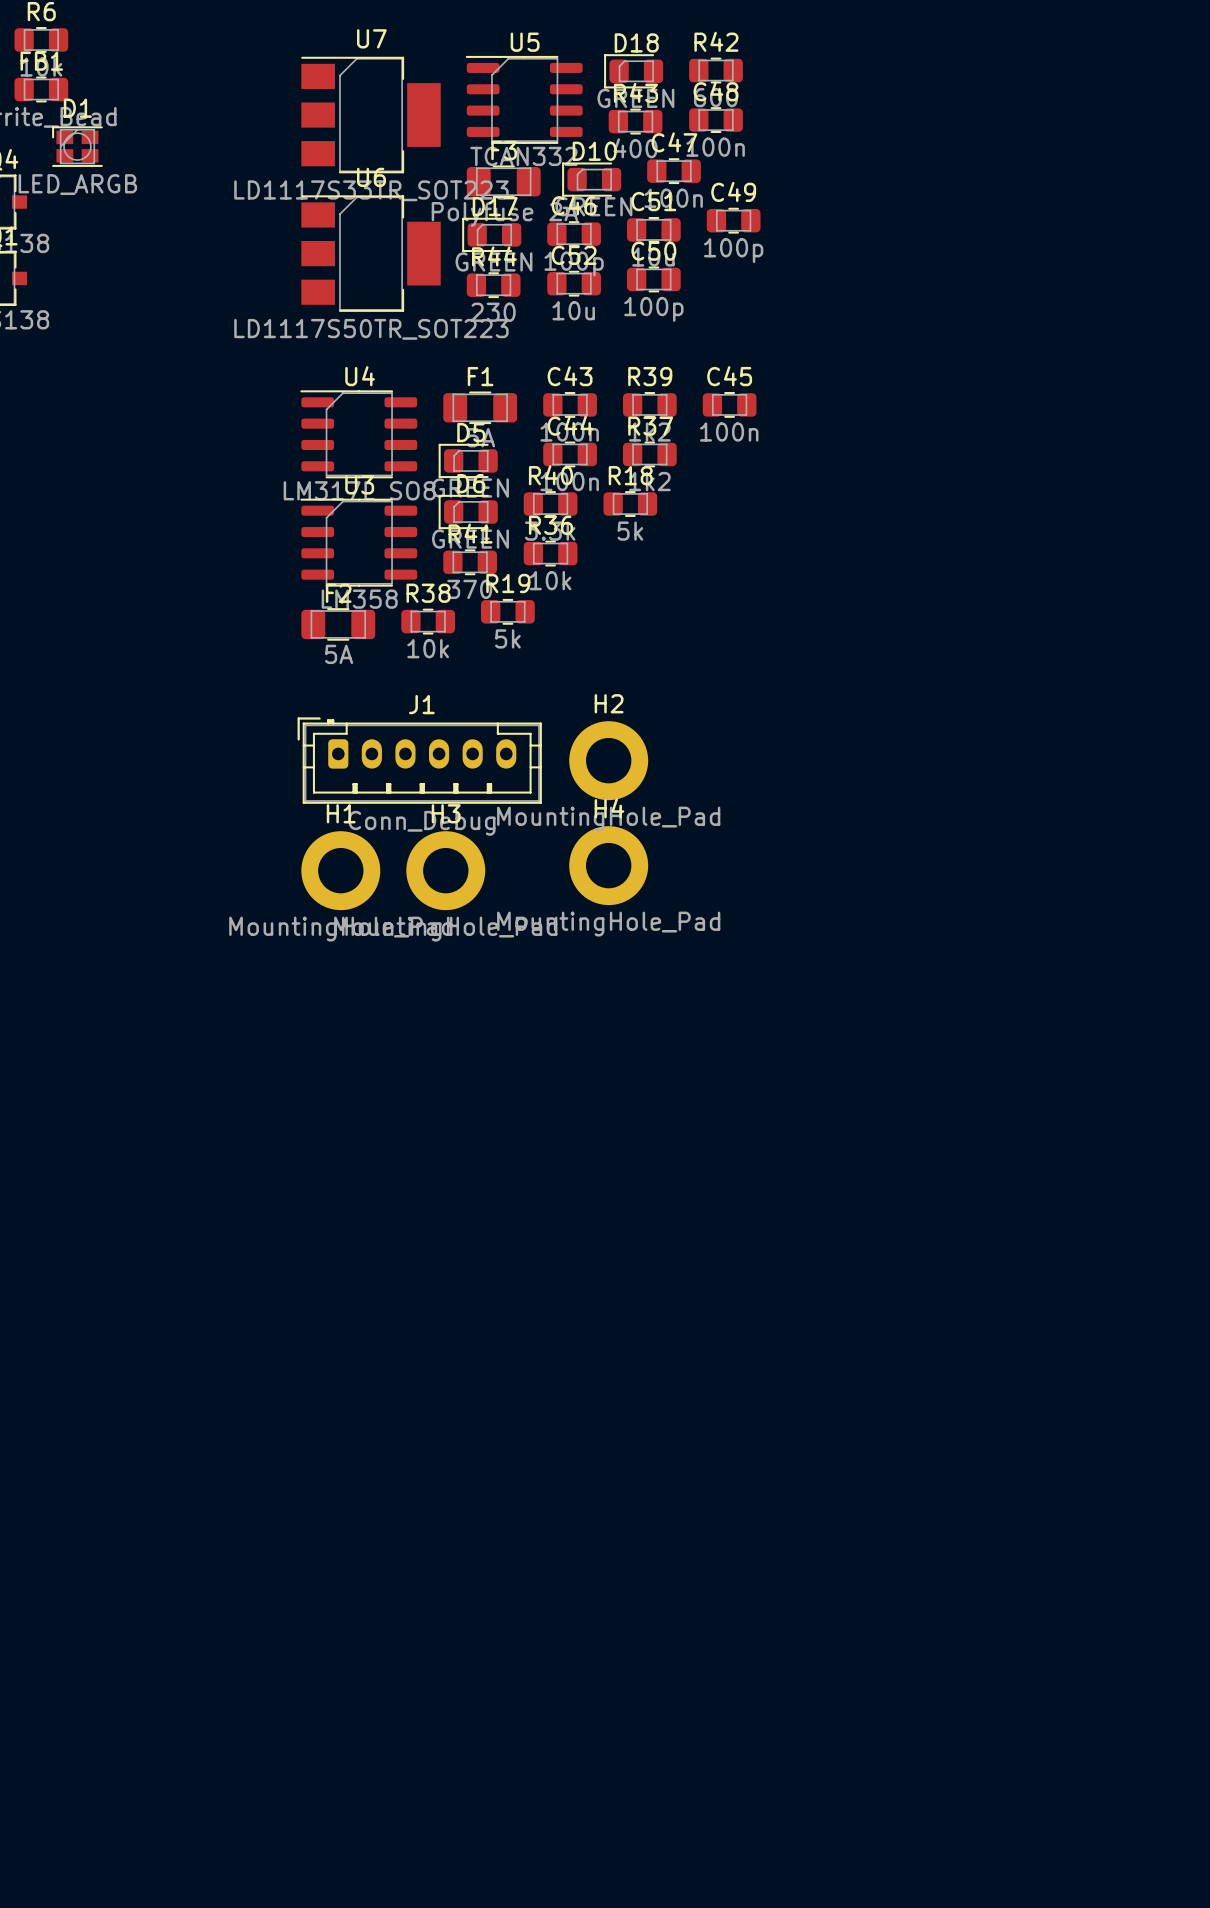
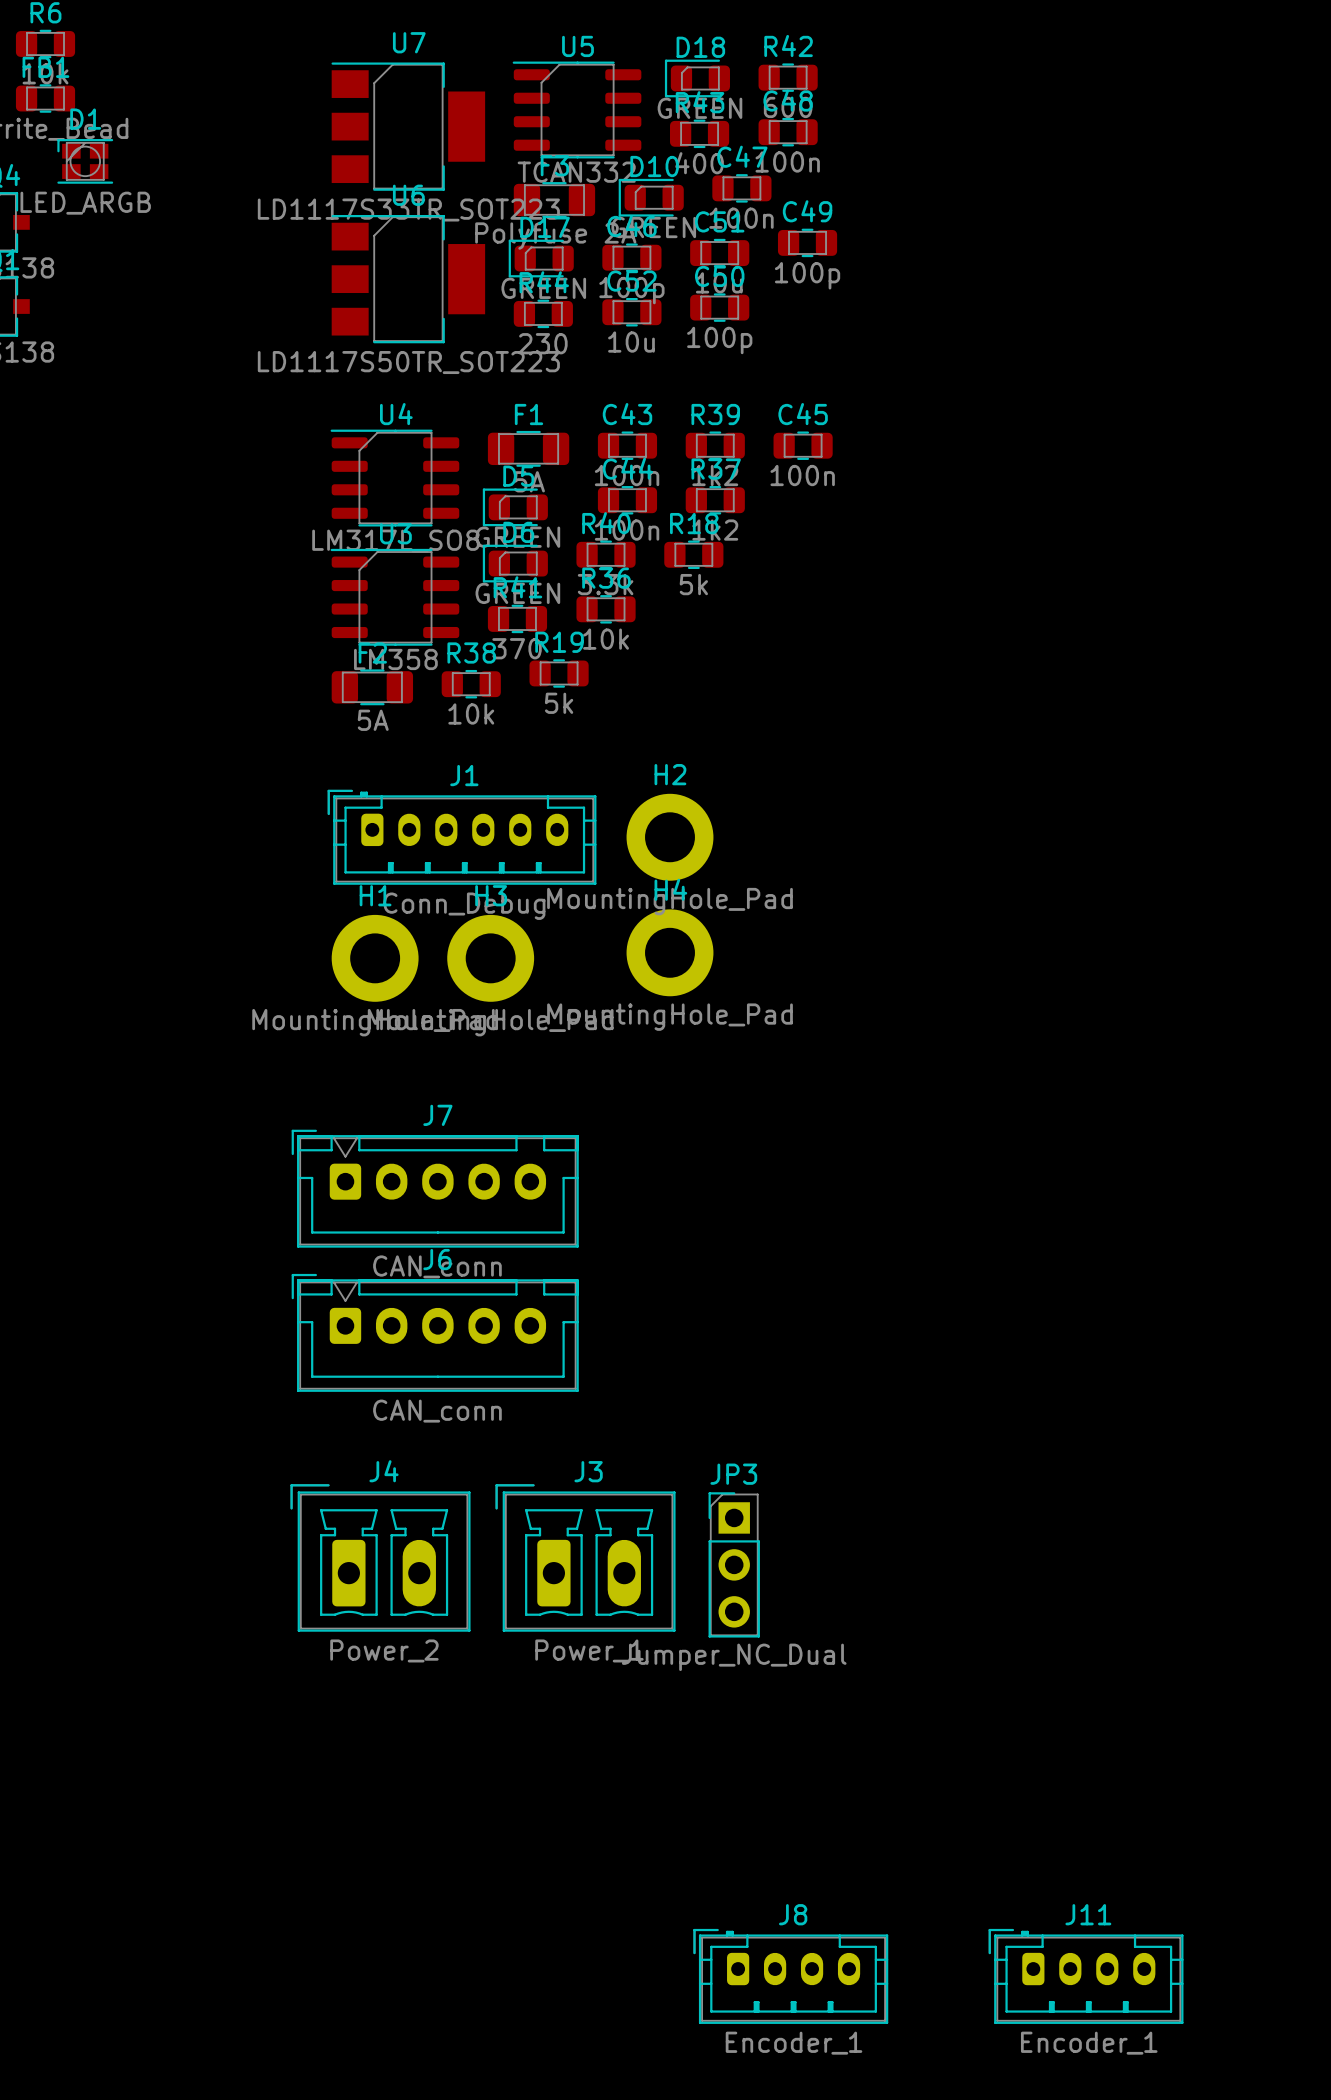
J7: none -> CAN_conn (435, 1188)
J6: none -> CAN_conn (435, 1332)
J4: none -> Power_2 (380, 1557)
J3: none -> Power_1 (585, 1557)
JP3: none -> Jumper_NC_Dual (734, 1564)
J8: none -> Encoder_1 (790, 1976)
J11: none -> Encoder_1 (1086, 1976)

